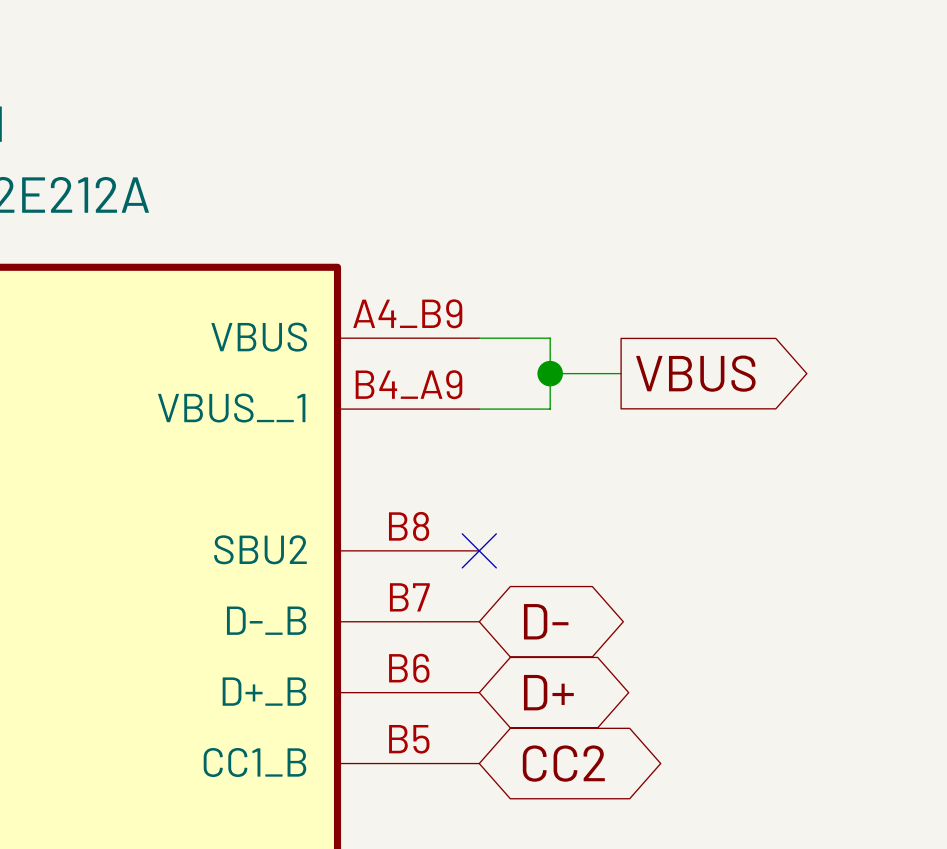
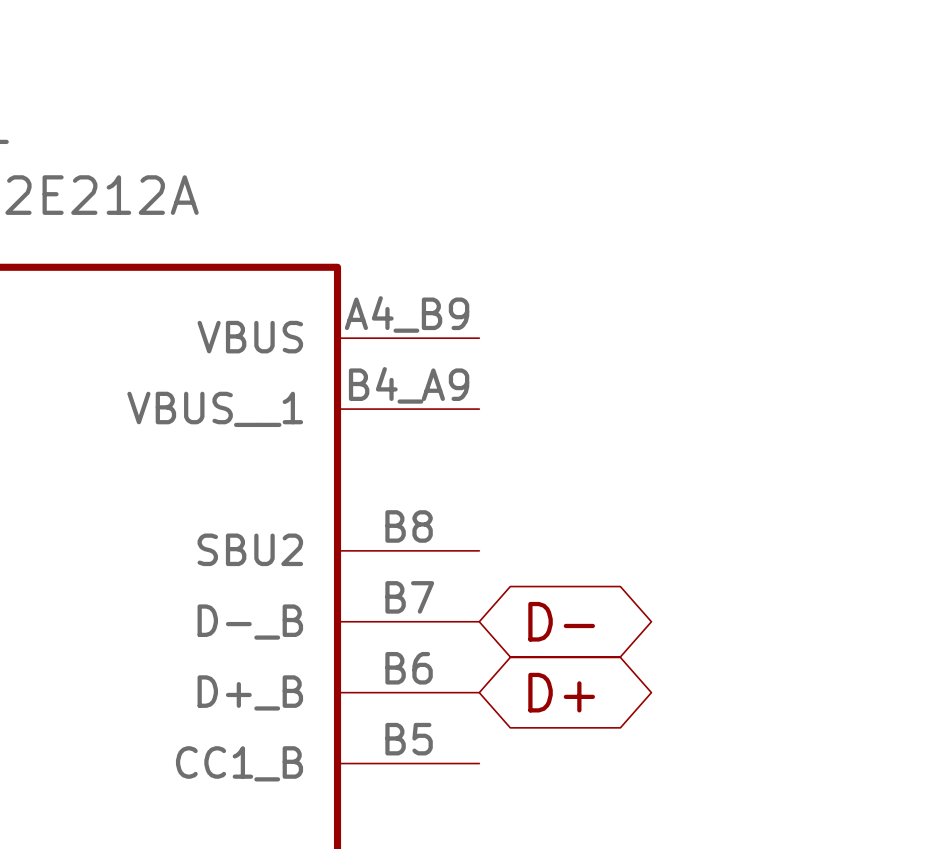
wire: (479, 338) (550, 338) (550, 409) (479, 409) -> none
wire: (550, 373) (621, 373) -> none
junction: (550, 373) -> none
global label: VBUS (695, 373) -> none
no-connect mark: (479, 550) -> none
global label: CC2 (563, 763) -> none

